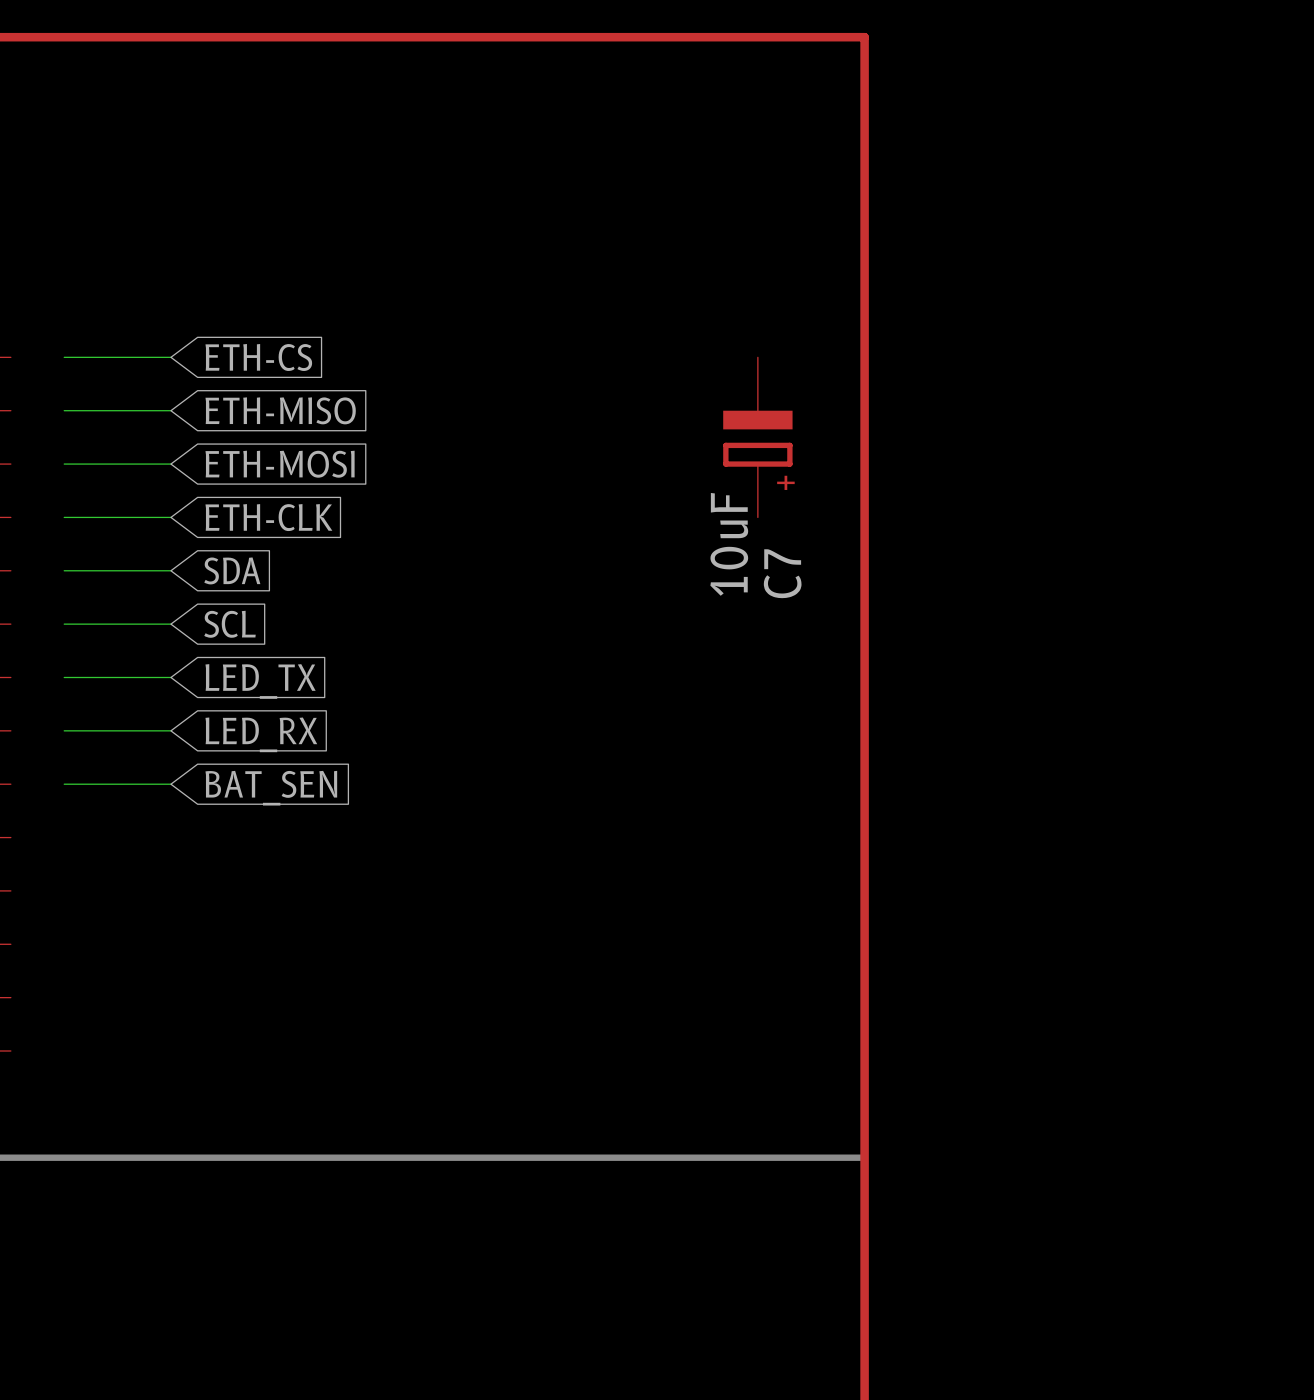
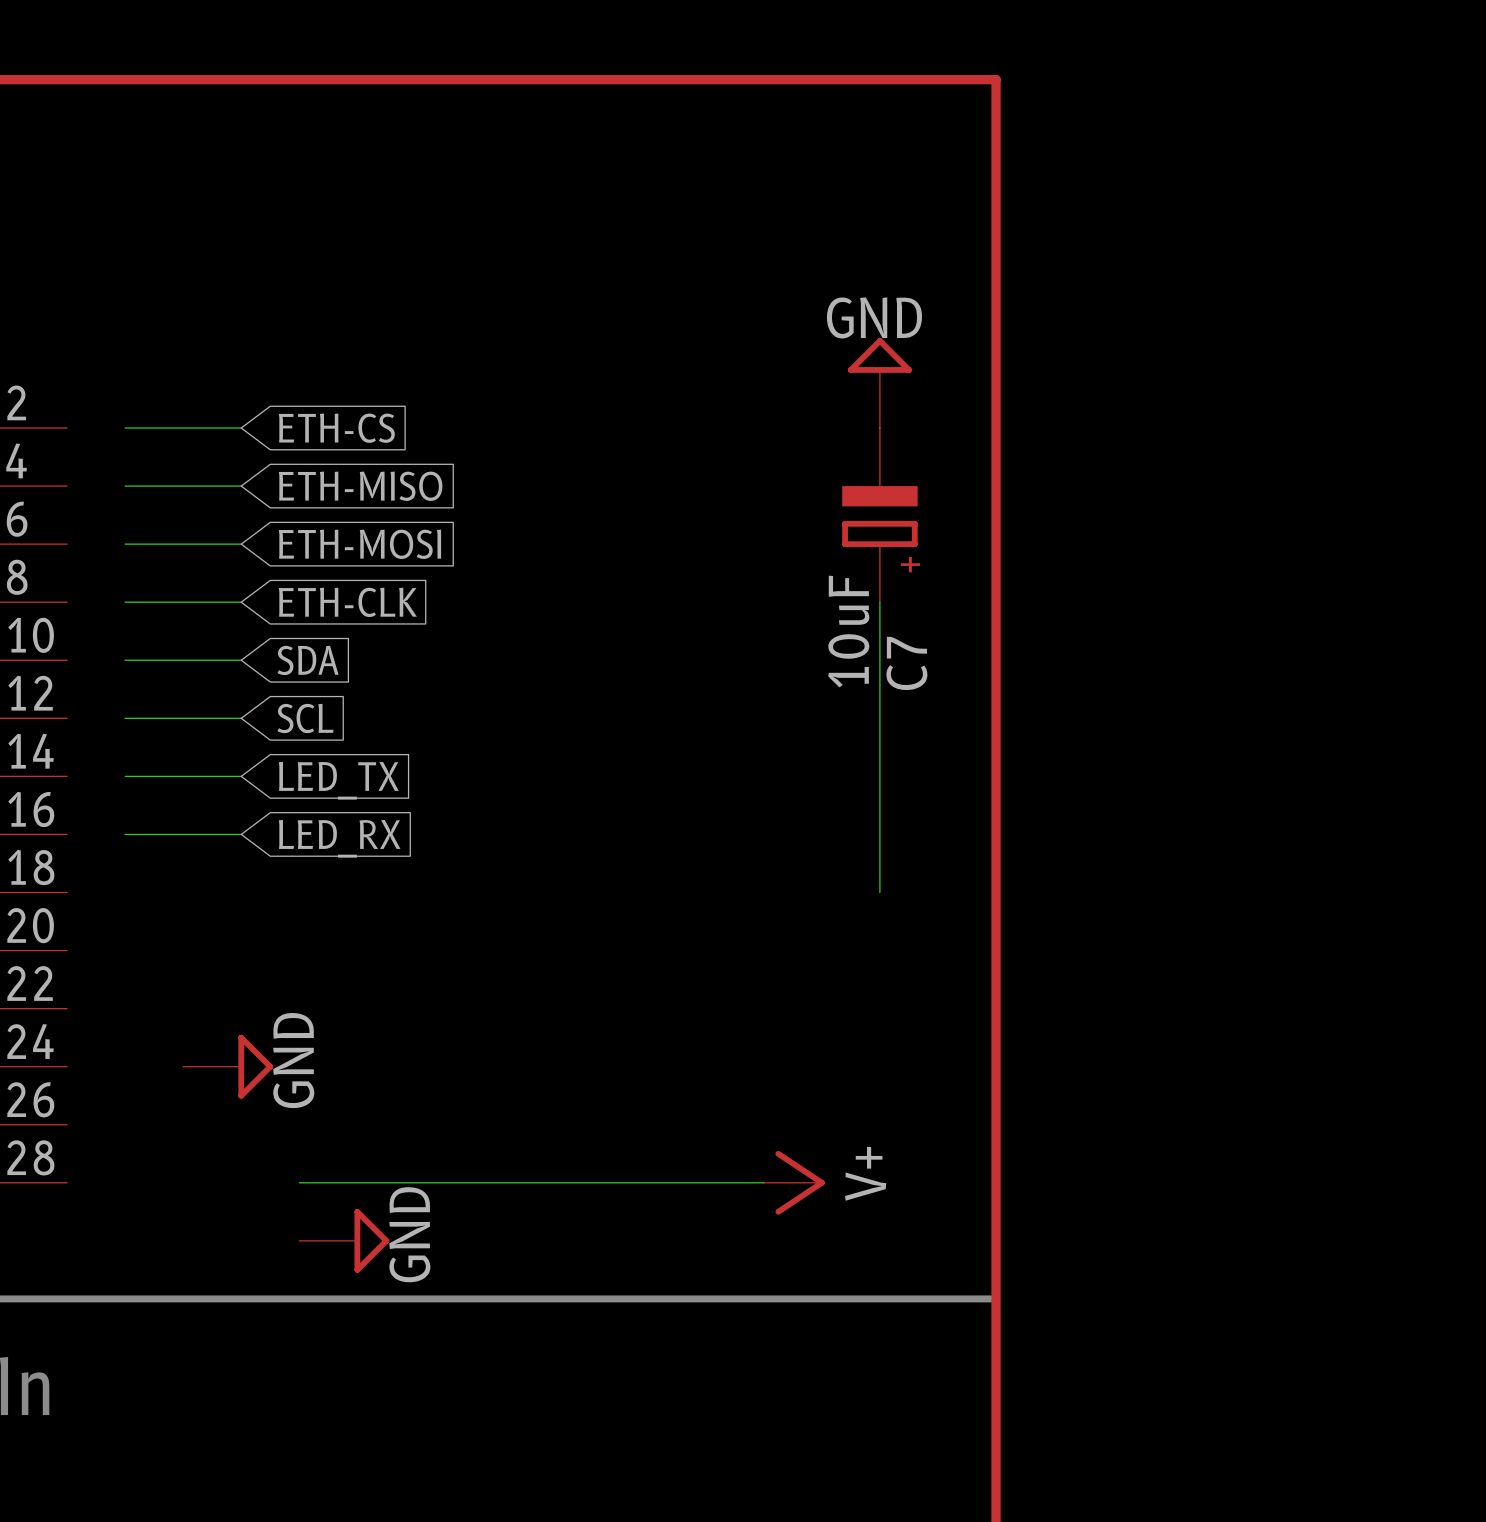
power symbol: none -> GND (879, 383)
wire: none -> (879, 602) (879, 892)
wire: (64, 784) (170, 784) -> none
global label: BAT_SEN (271, 788) -> none
power symbol: none -> GND (228, 1066)
wire: none -> (299, 1182) (763, 1182)
power symbol: none -> V+ (794, 1182)
power symbol: none -> GND (344, 1240)

